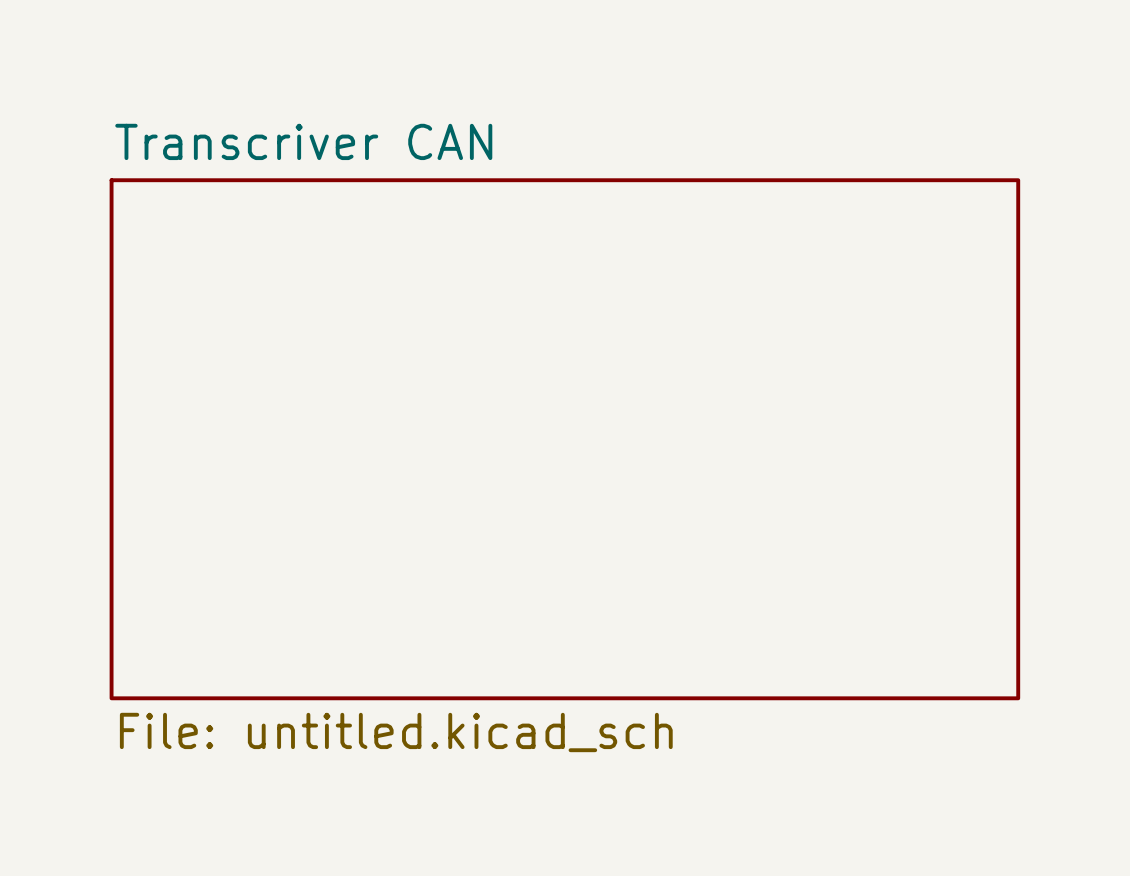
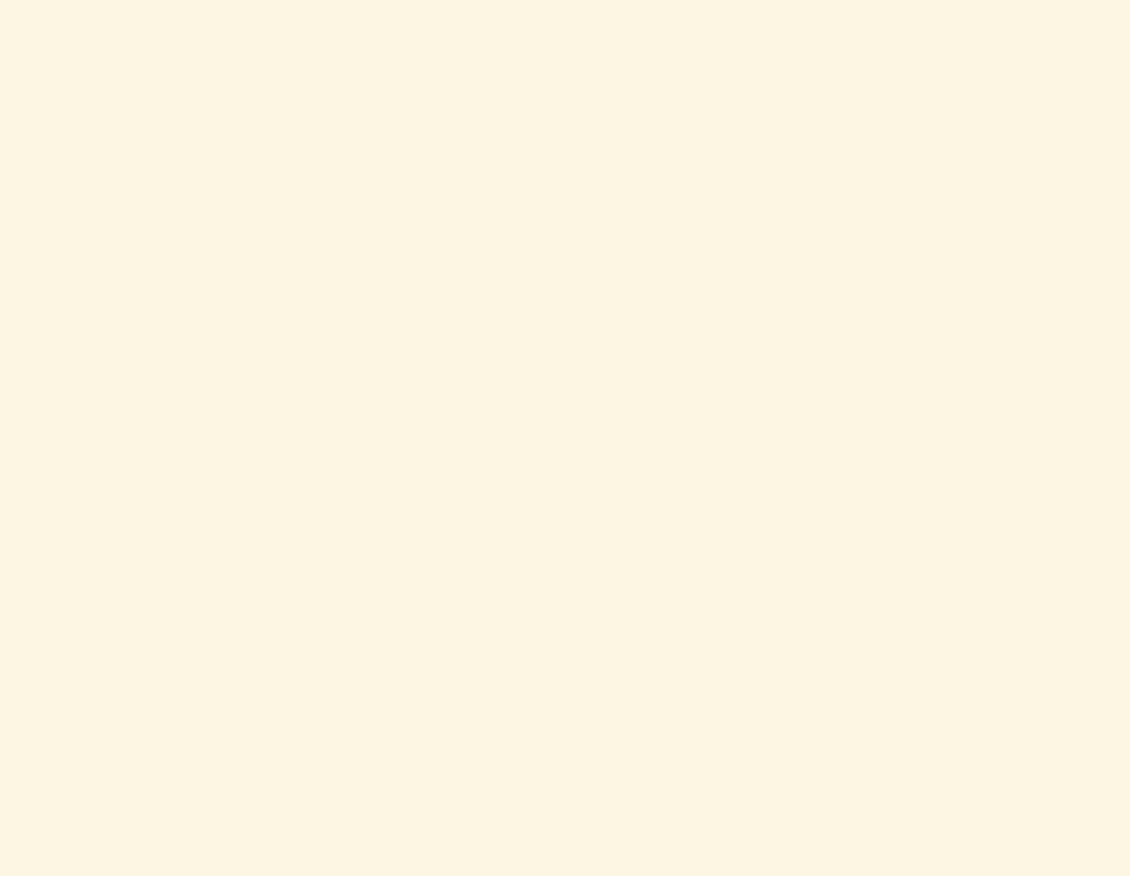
sheet Transcriver CAN: File: untitled.kicad_sch (564, 439) -> none

